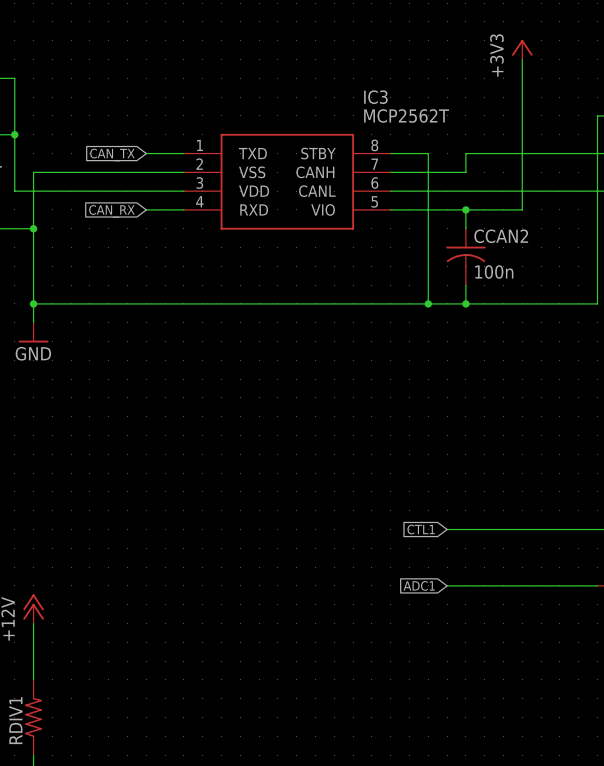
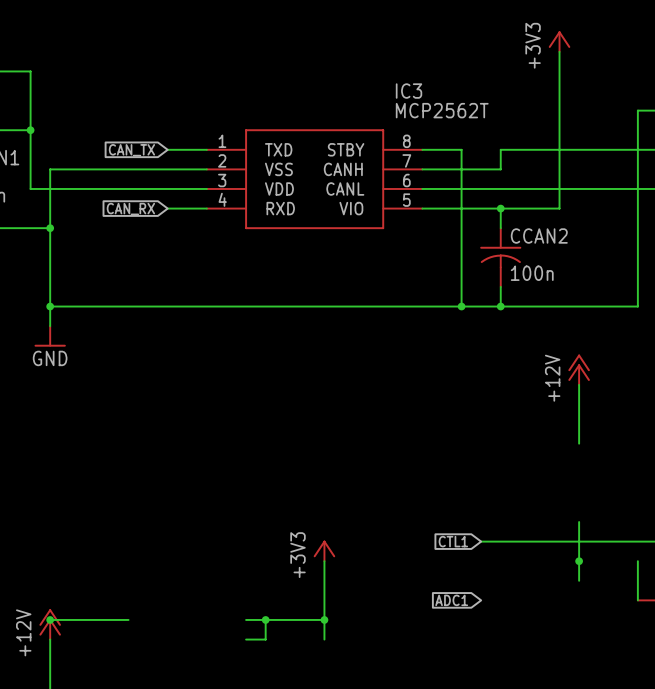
power symbol: none -> +12V (579, 369)
wire: none -> (579, 384) (579, 443)
wire: none -> (579, 522) (579, 580)
power symbol: none -> +3V3 (324, 550)
wire: none -> (324, 561) (324, 639)
junction: none -> (579, 561)
wire: (447, 585) (597, 585) -> (637, 561) (637, 600)
wire: none -> (50, 619) (128, 619)
junction: none -> (50, 619)
wire: none -> (246, 619) (324, 619)
wire: none -> (265, 619) (265, 639) (246, 639)
junction: none -> (265, 619)
junction: none -> (324, 619)

